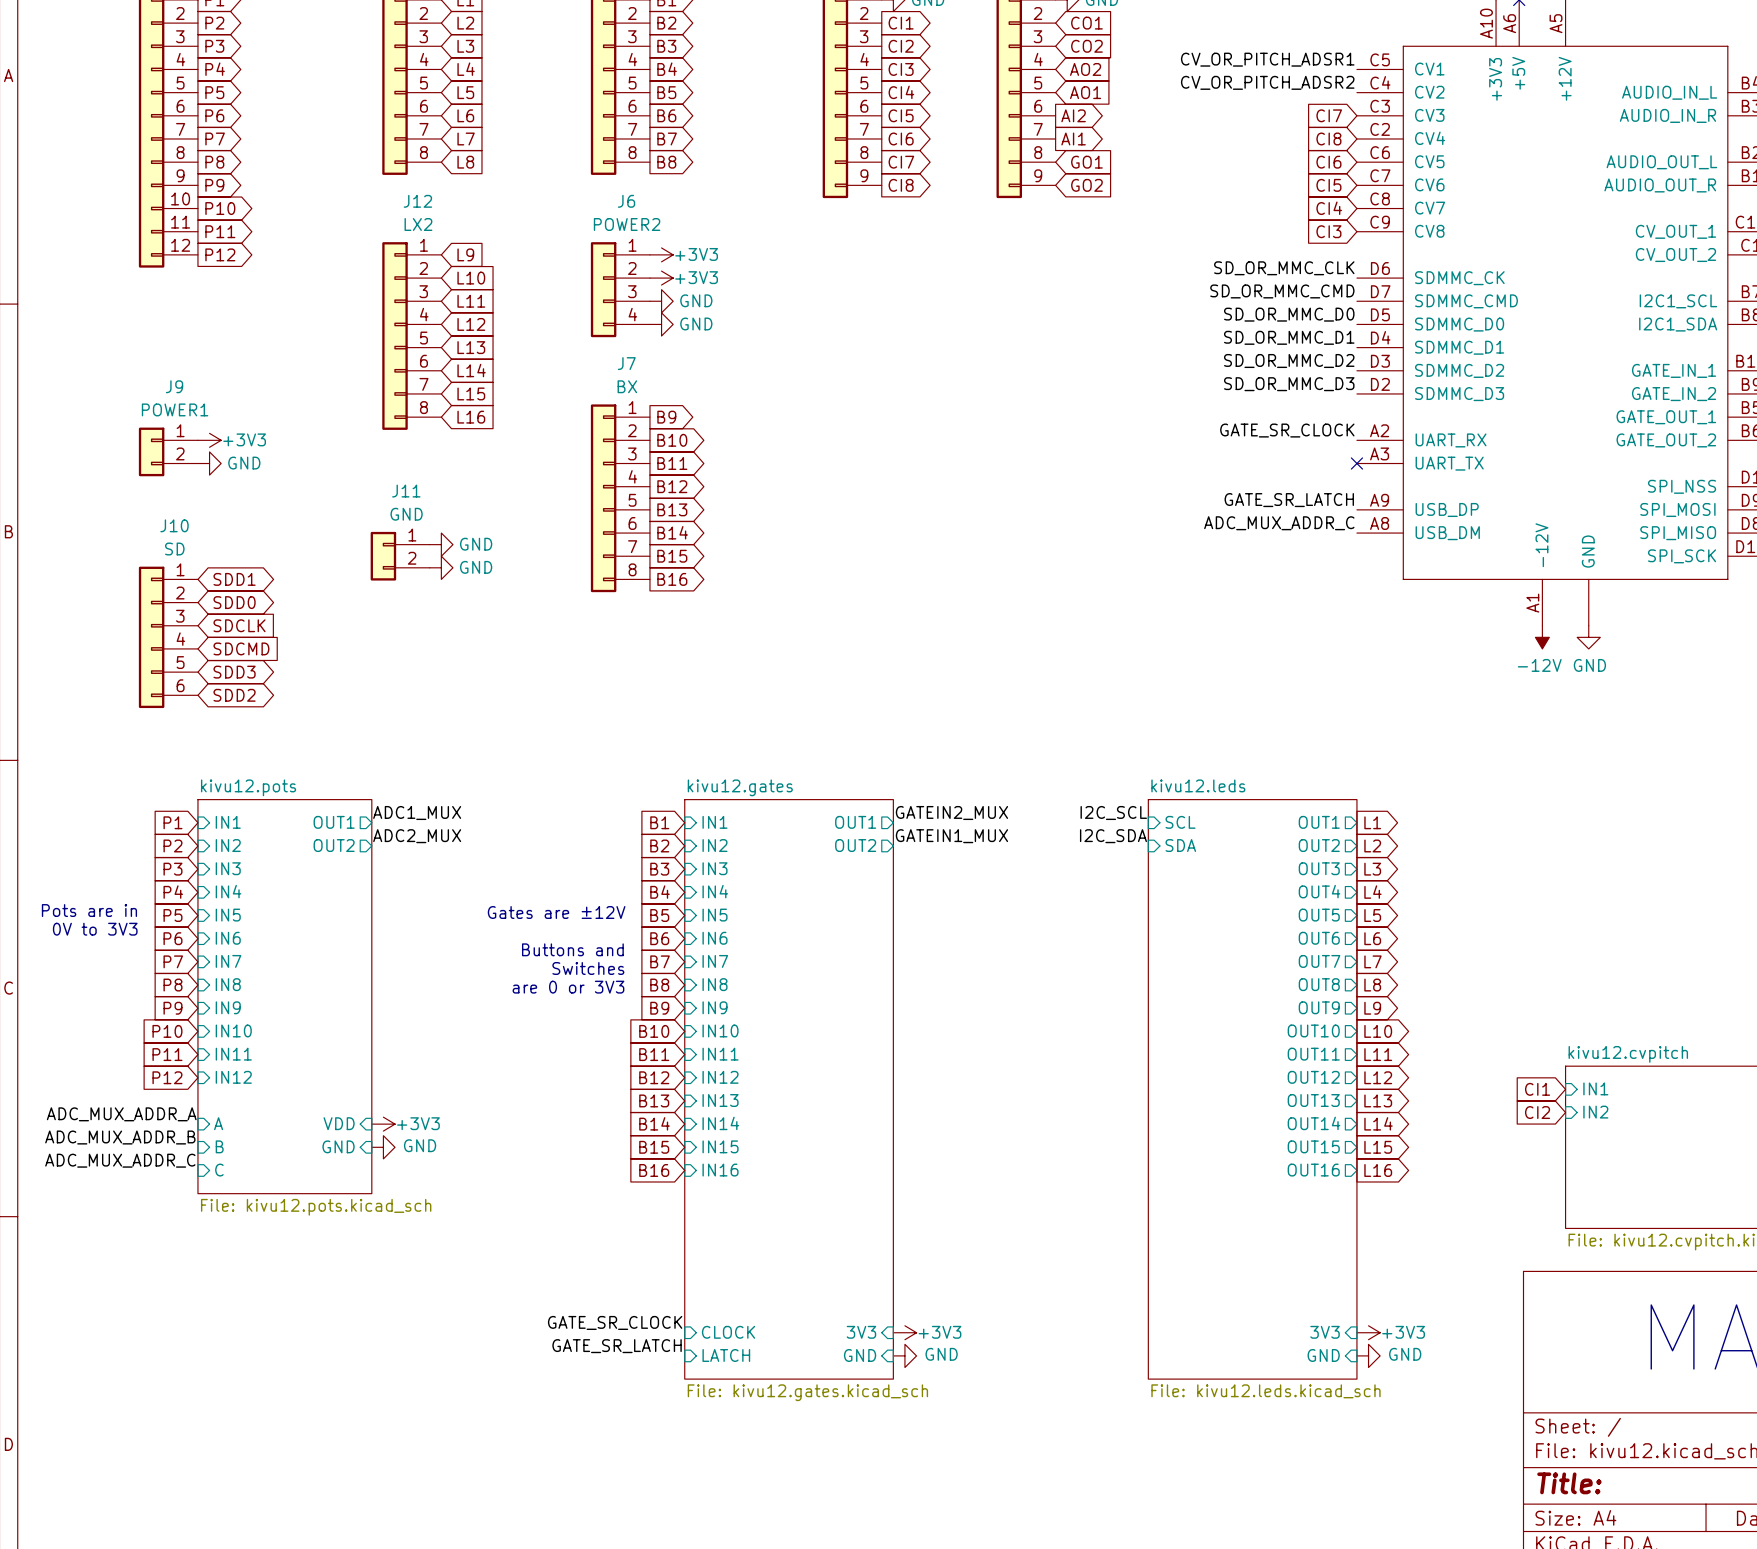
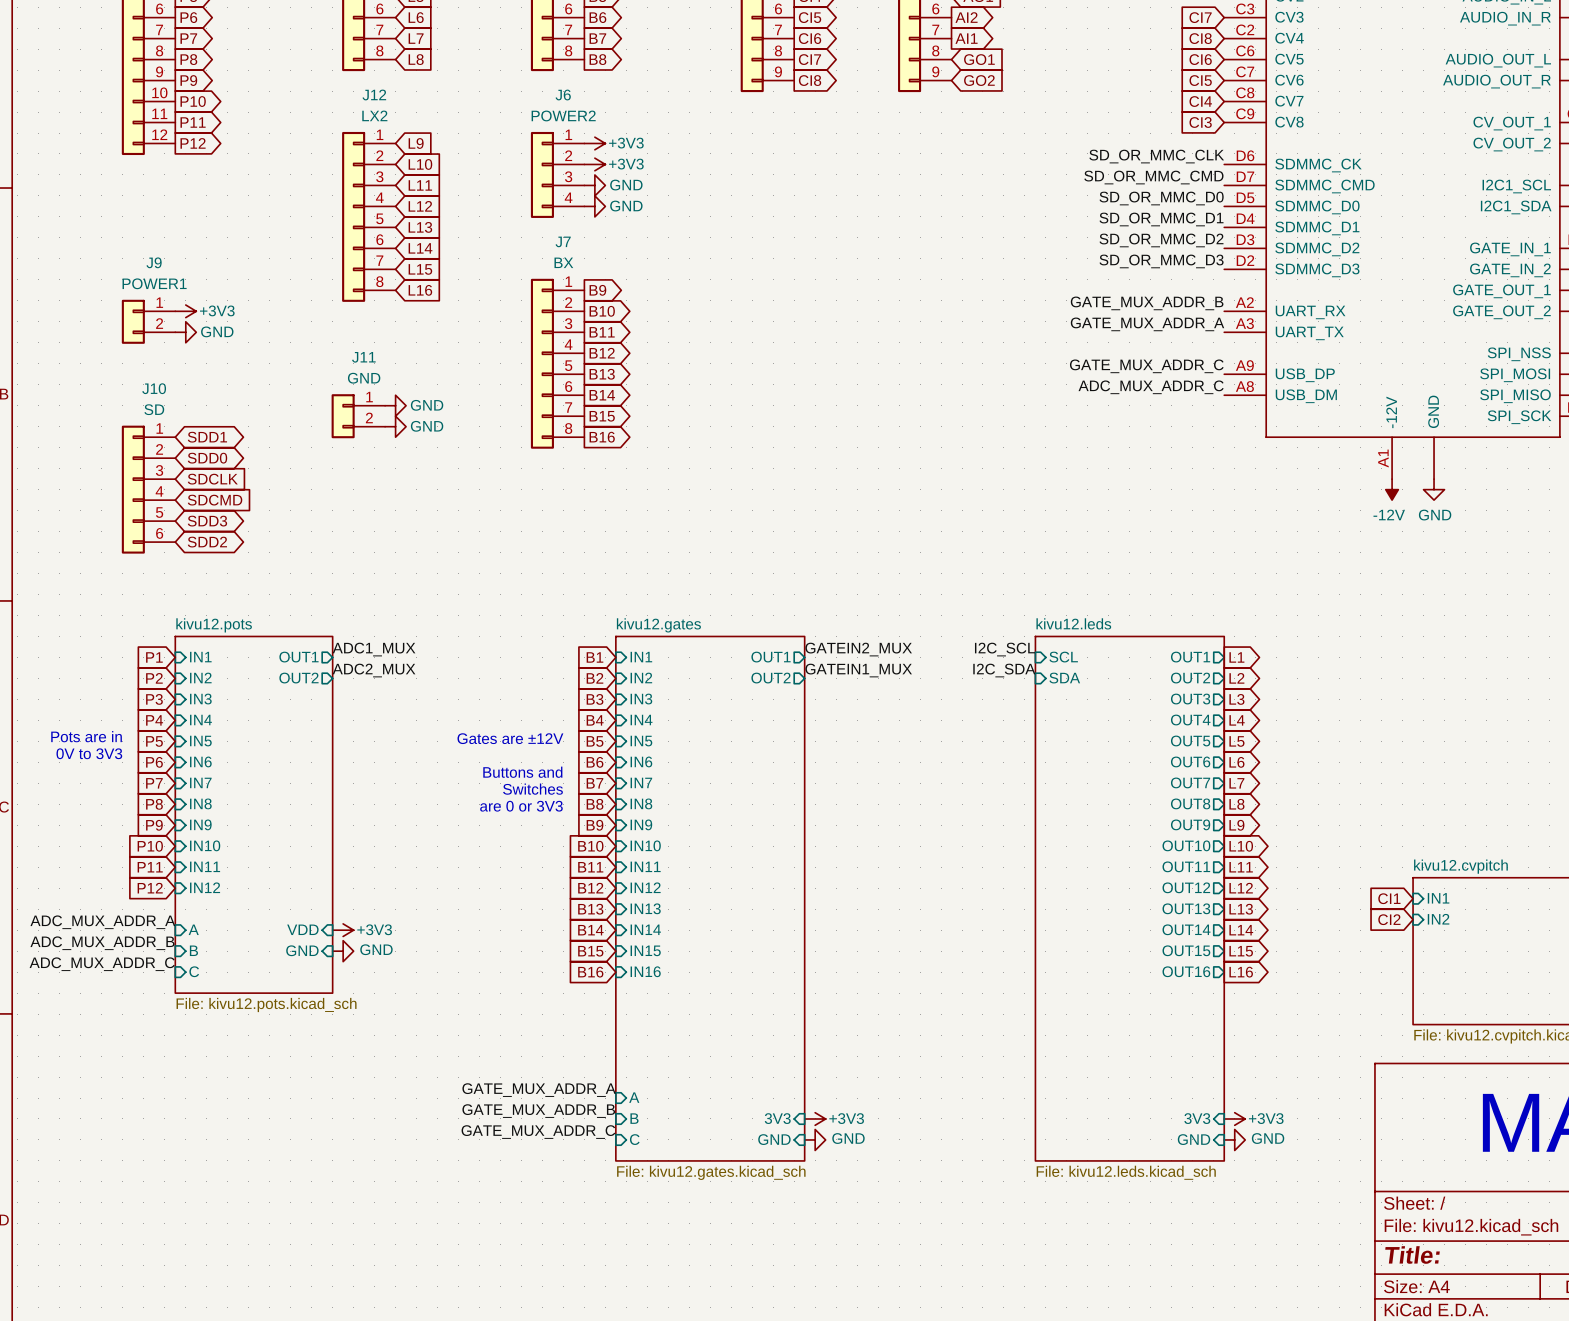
label: GATE_SR_CLOCK (1287, 430) -> GATE_MUX_ADDR_B (1147, 303)
label: none -> GATE_MUX_ADDR_A (1147, 324)
no-connect mark: (1356, 463) -> none
label: GATE_SR_LATCH (1289, 500) -> GATE_MUX_ADDR_C (1146, 366)
label: none -> GATE_MUX_ADDR_A (539, 1090)
sheet pin: none -> A (634, 1097)
label: GATE_SR_CLOCK (615, 1322) -> GATE_MUX_ADDR_B (538, 1111)
sheet pin: CLOCK (728, 1332) -> B (634, 1118)
label: GATE_SR_LATCH (617, 1346) -> GATE_MUX_ADDR_C (538, 1132)
sheet pin: LATCH (726, 1355) -> C (634, 1139)

